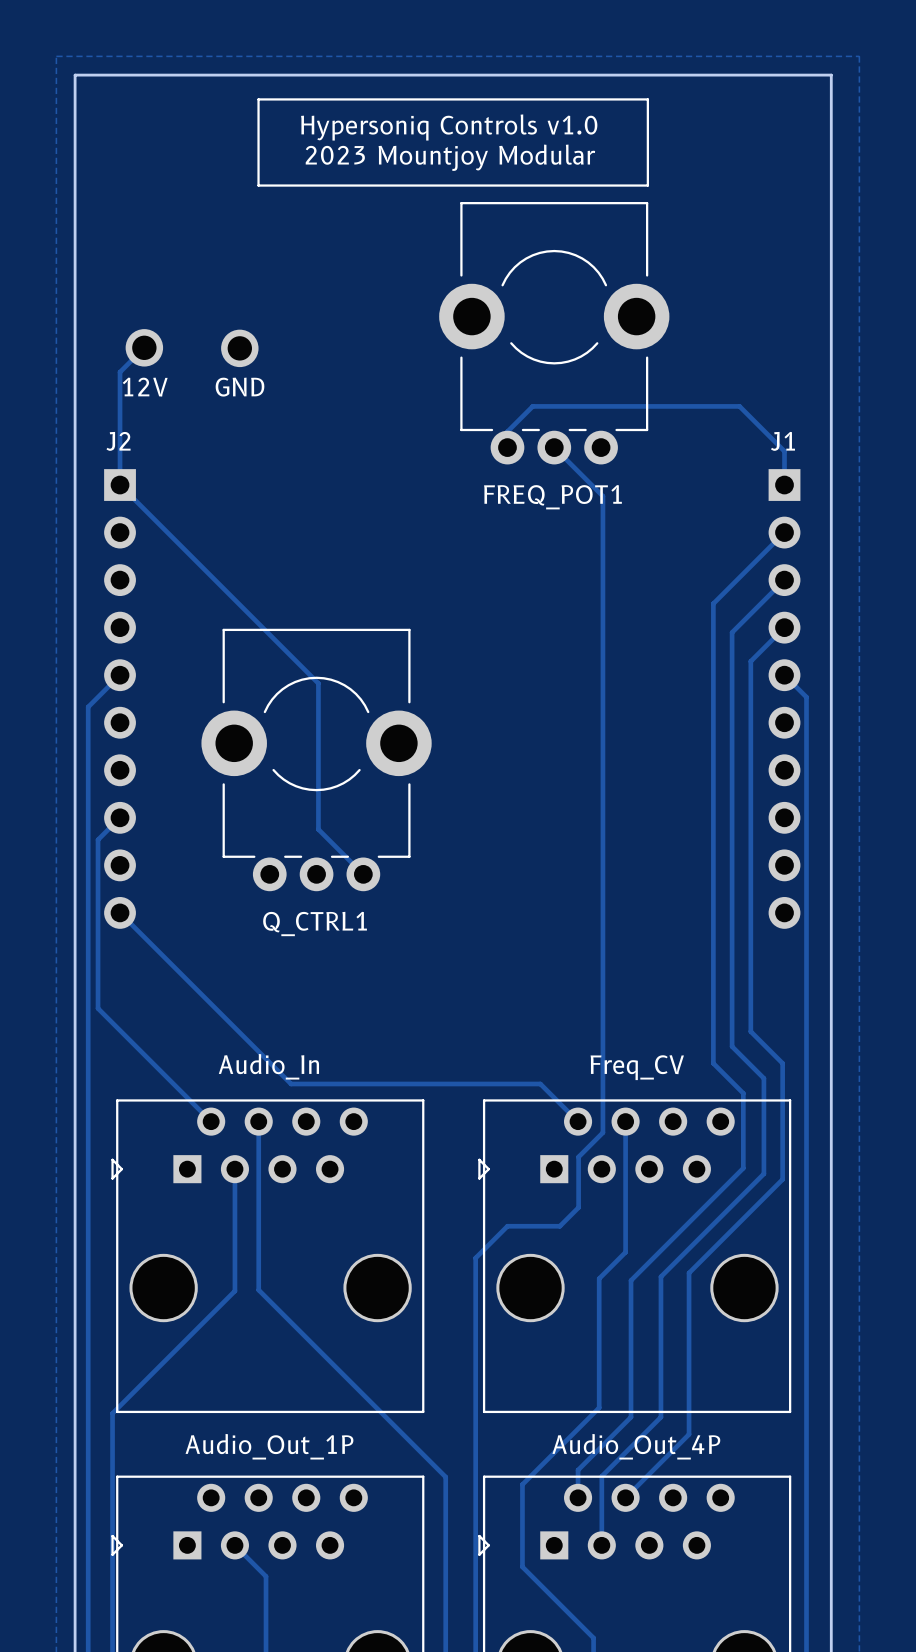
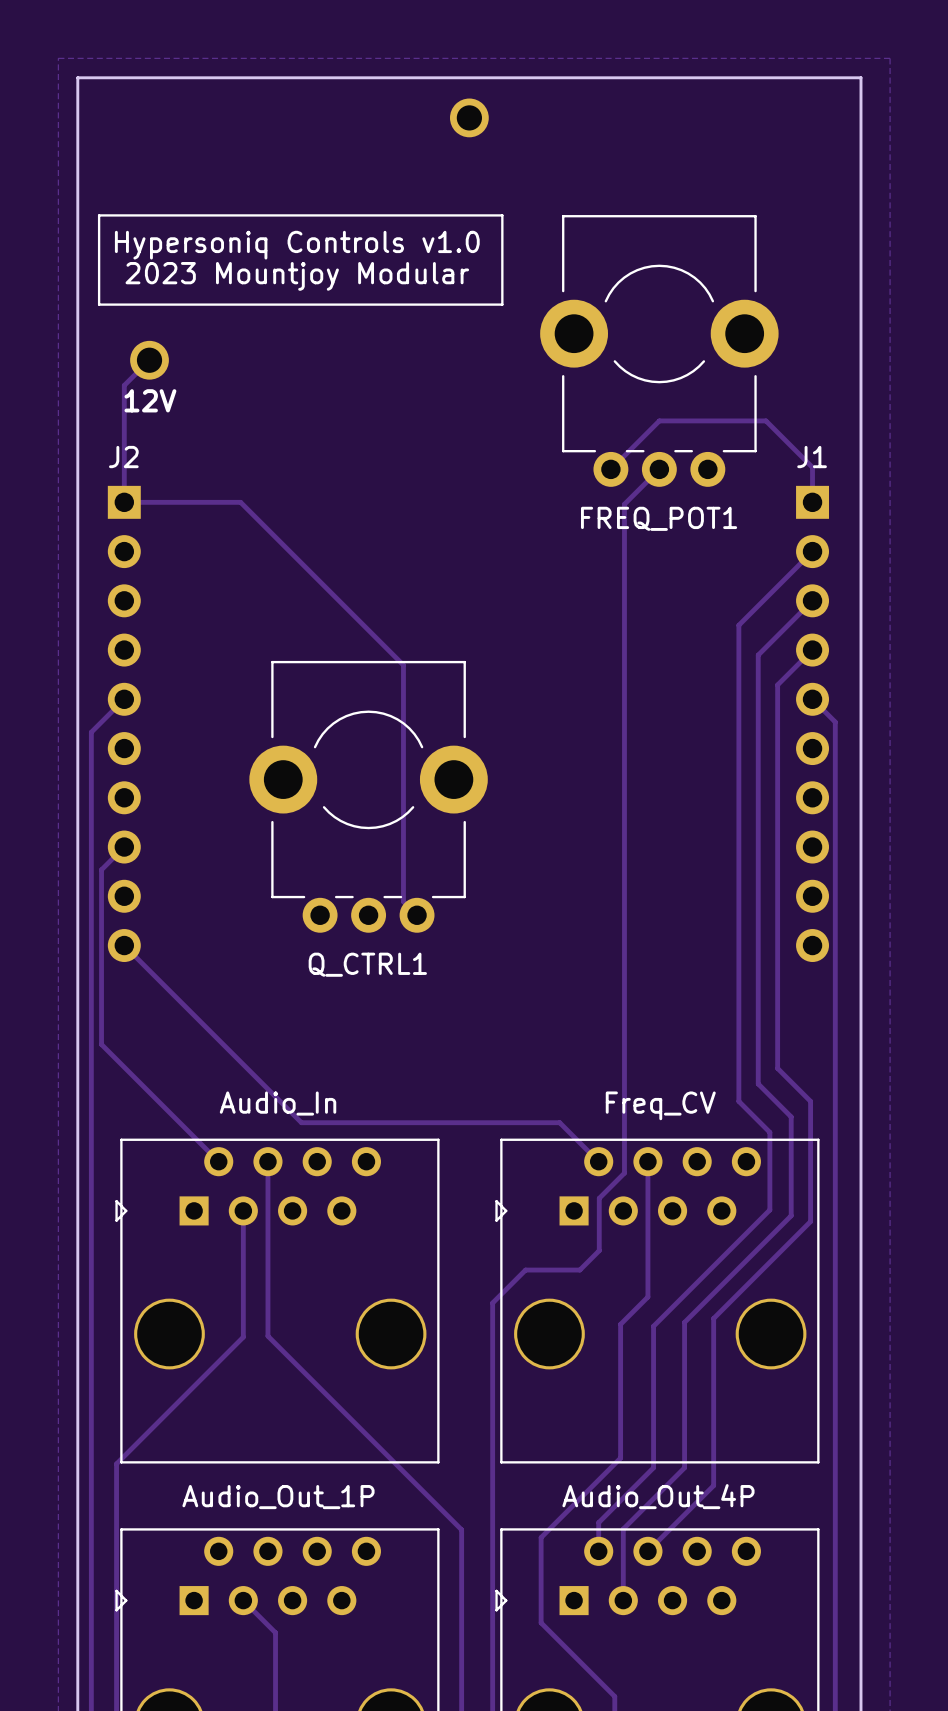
line: (258, 99) (647, 99) (647, 185) (258, 185) (258, 99) -> (99, 215) (502, 215) (502, 304) (99, 304) (99, 215)
text position: Hypersoniq Controls v1.0 (449, 127) -> Hypersoniq Controls v1.0 (297, 245)
text position: 2023 Mountjoy Modular (450, 157) -> 2023 Mountjoy Modular (297, 276)
FREQ_POT1 position: (554, 333) -> (659, 350)
part position: (239, 348) -> (469, 117)
text: GND (239, 387) -> none
track: (636, 406) (532, 406) (507, 431) (507, 447) -> (659, 420) (610, 469)
track: (554, 447) (602, 496) -> (659, 469) (624, 504) (624, 513)
track: (120, 485) (318, 683) (318, 829) (363, 874) -> (124, 502) (240, 502) (403, 665) (403, 901) (417, 915)
Q_CTRL1 position: (316, 759) -> (368, 796)

